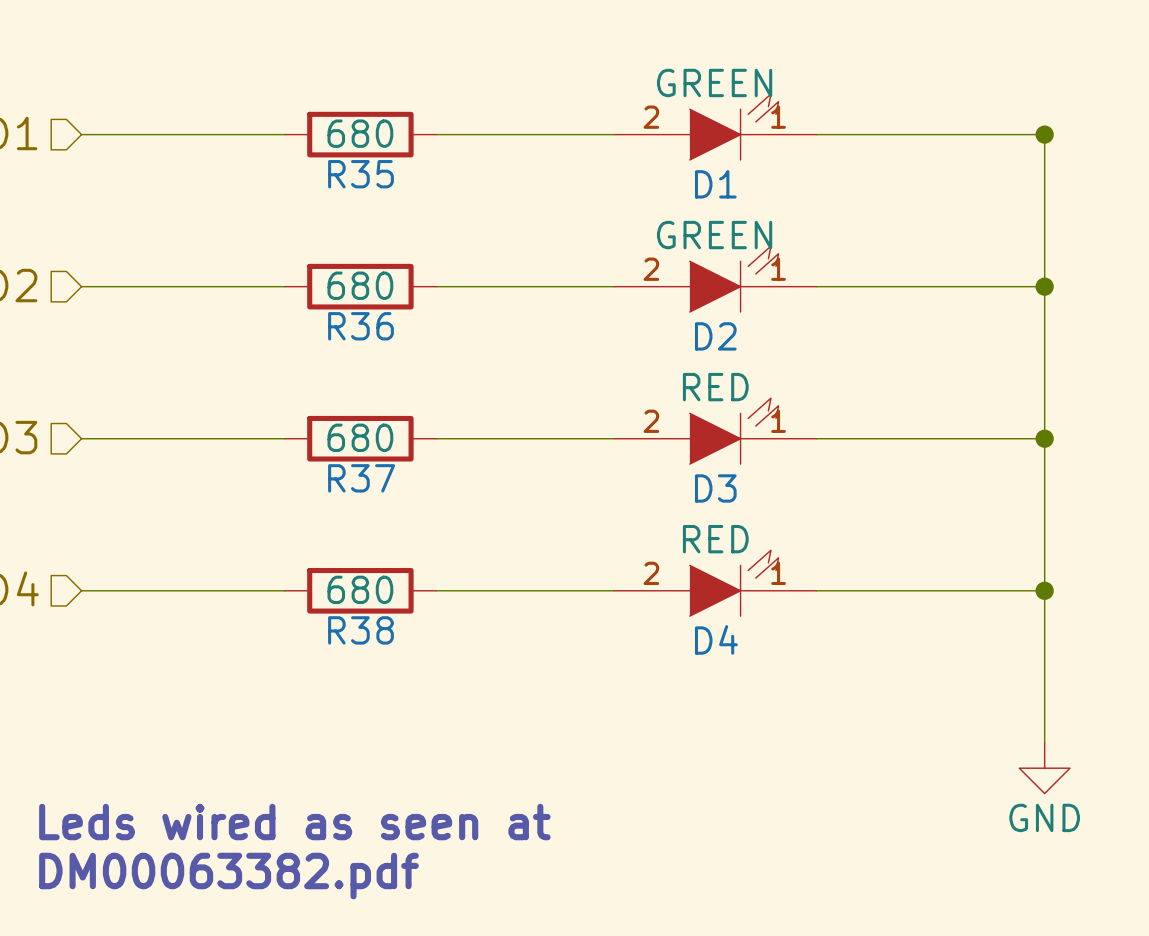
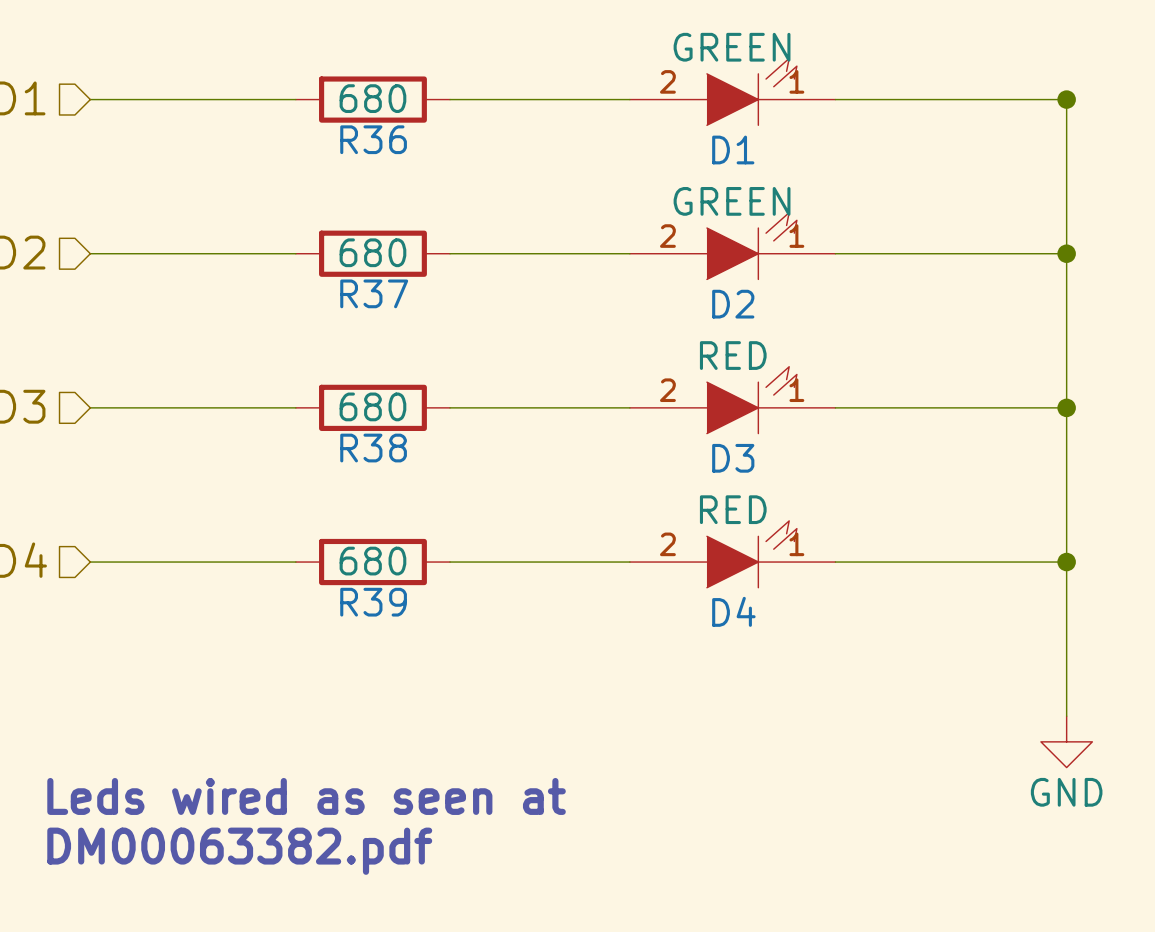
R35 name: R35 (360, 174) -> R36 (373, 139)
R36 name: R36 (360, 326) -> R37 (374, 293)
R37 name: R37 (361, 478) -> R38 (373, 448)
R38 name: R38 (360, 630) -> R39 (373, 602)

